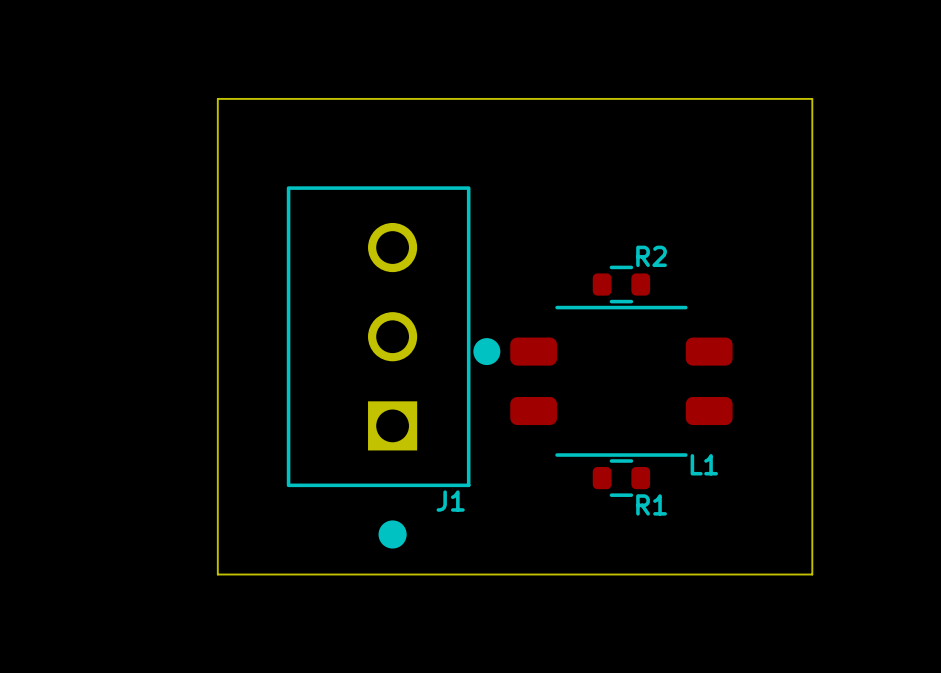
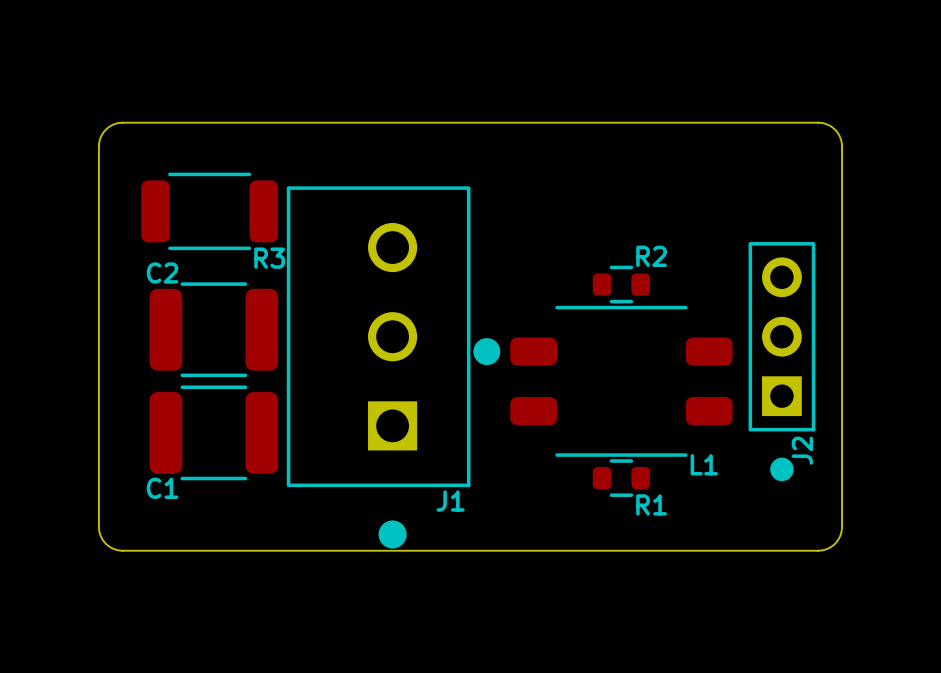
board edge: (217, 98) (812, 98) (812, 574) (217, 574) (217, 98) -> (122, 122) (113, 124) (105, 129) (100, 137) (98, 146) (98, 526) (102, 538) (110, 547) (122, 550) (818, 550) (830, 547) (838, 538) (842, 526) (842, 146) (838, 134) (830, 125) (818, 122) (122, 122)
R3: none -> (209, 211)
C2: none -> (213, 329)
J2: none -> (781, 361)
C1: none -> (213, 432)

